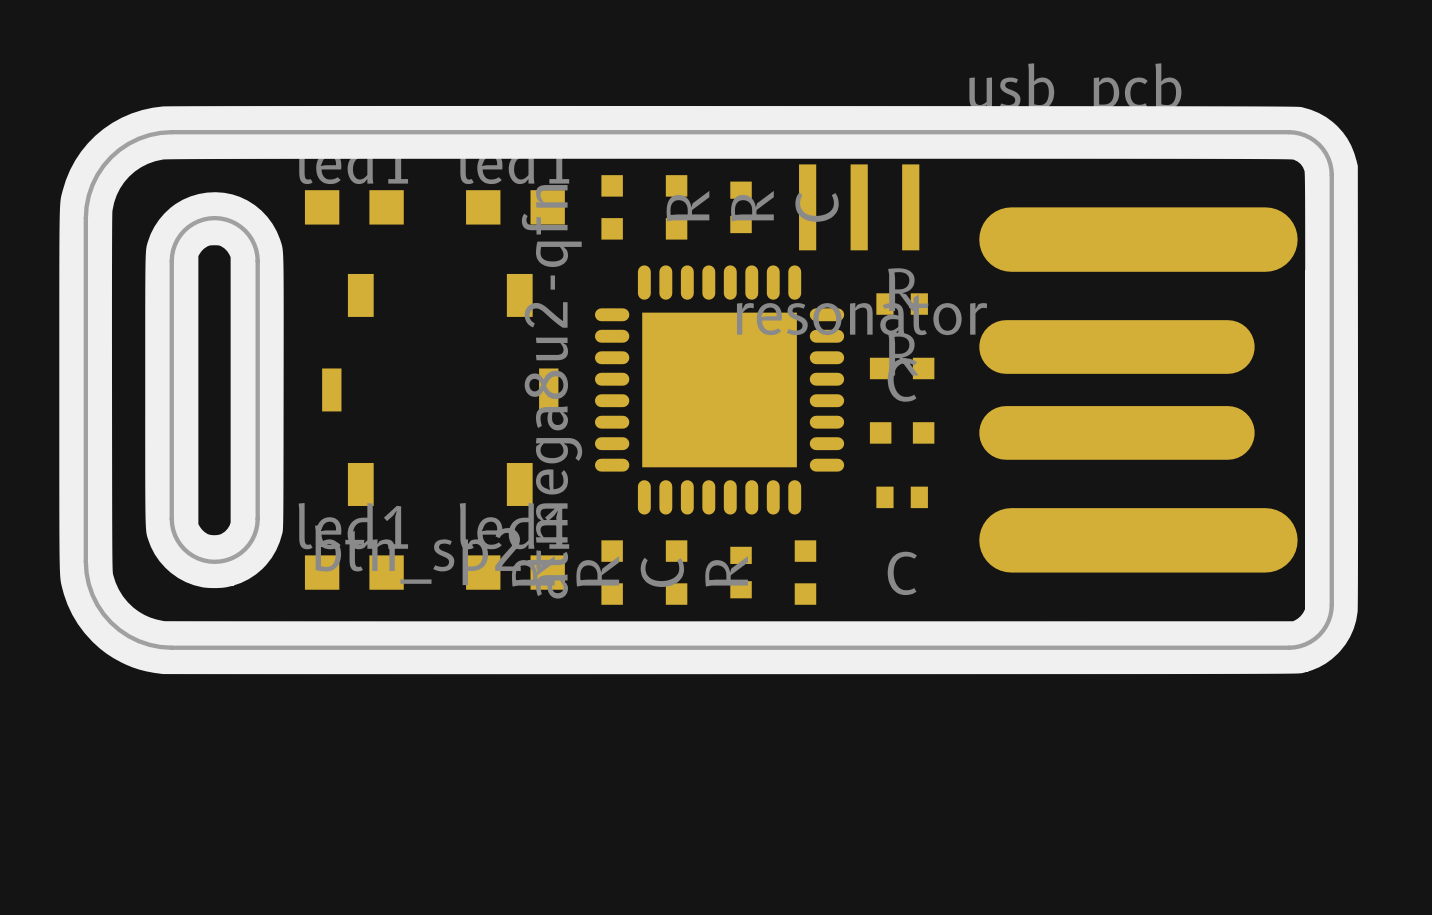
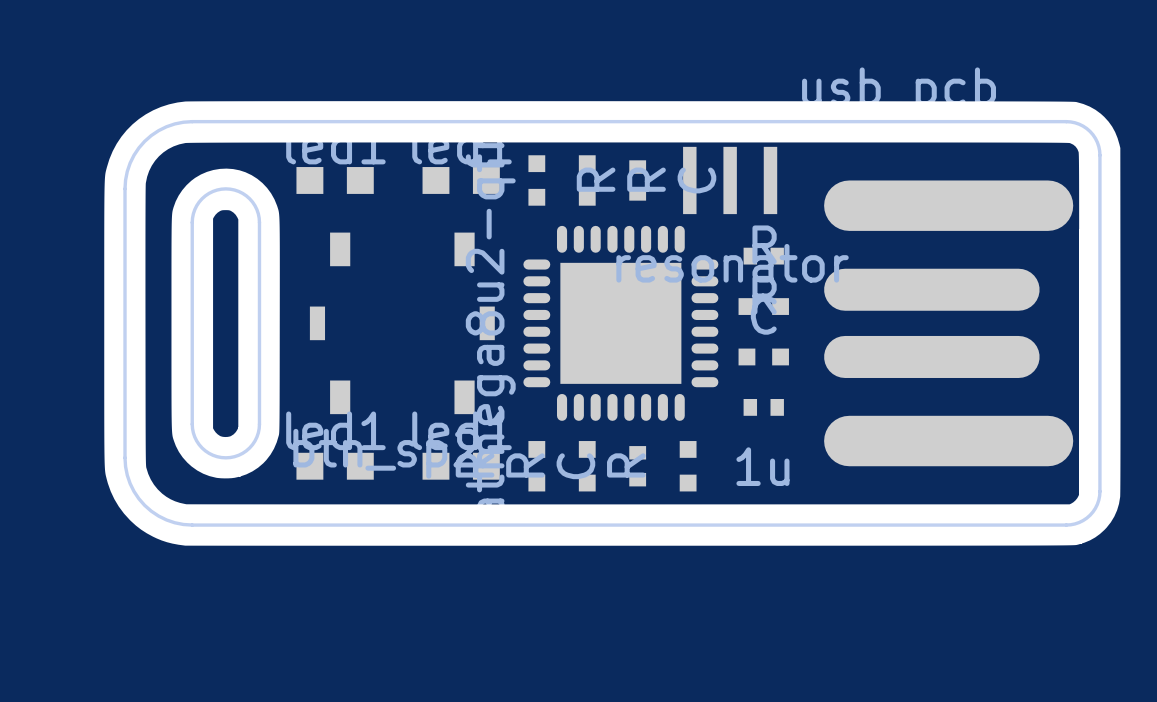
part value: C (902, 573) -> 1u (762, 466)

